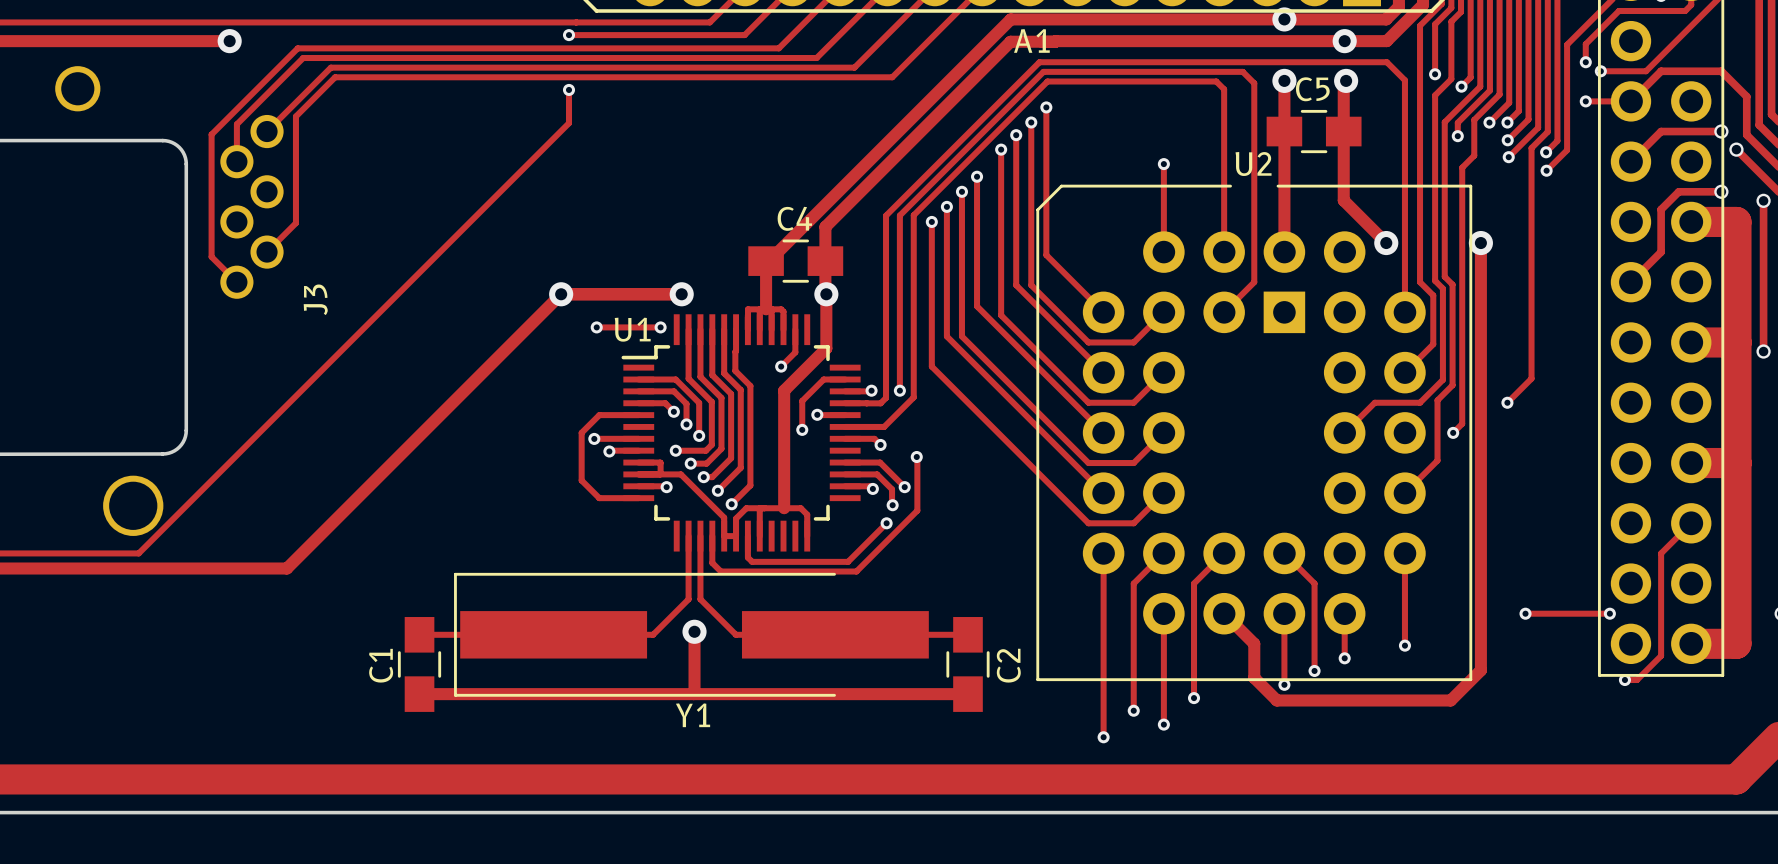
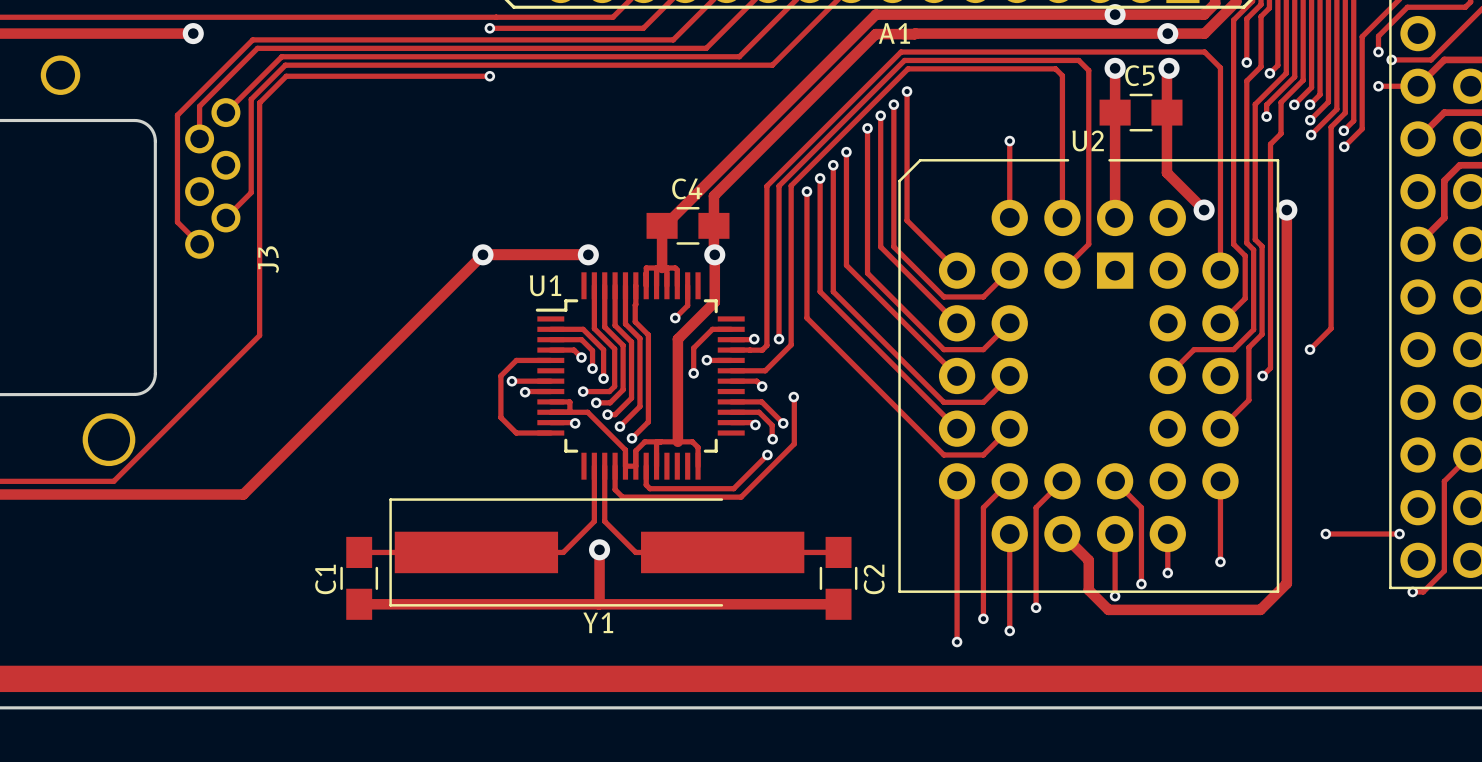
track: (569, 89) (569, 123) (305, 386) -> (490, 76) (286, 76) (259, 102) (259, 335)
track: (596, 327) (660, 327) -> none
via: (596, 327) -> none
via: (660, 327) -> none

